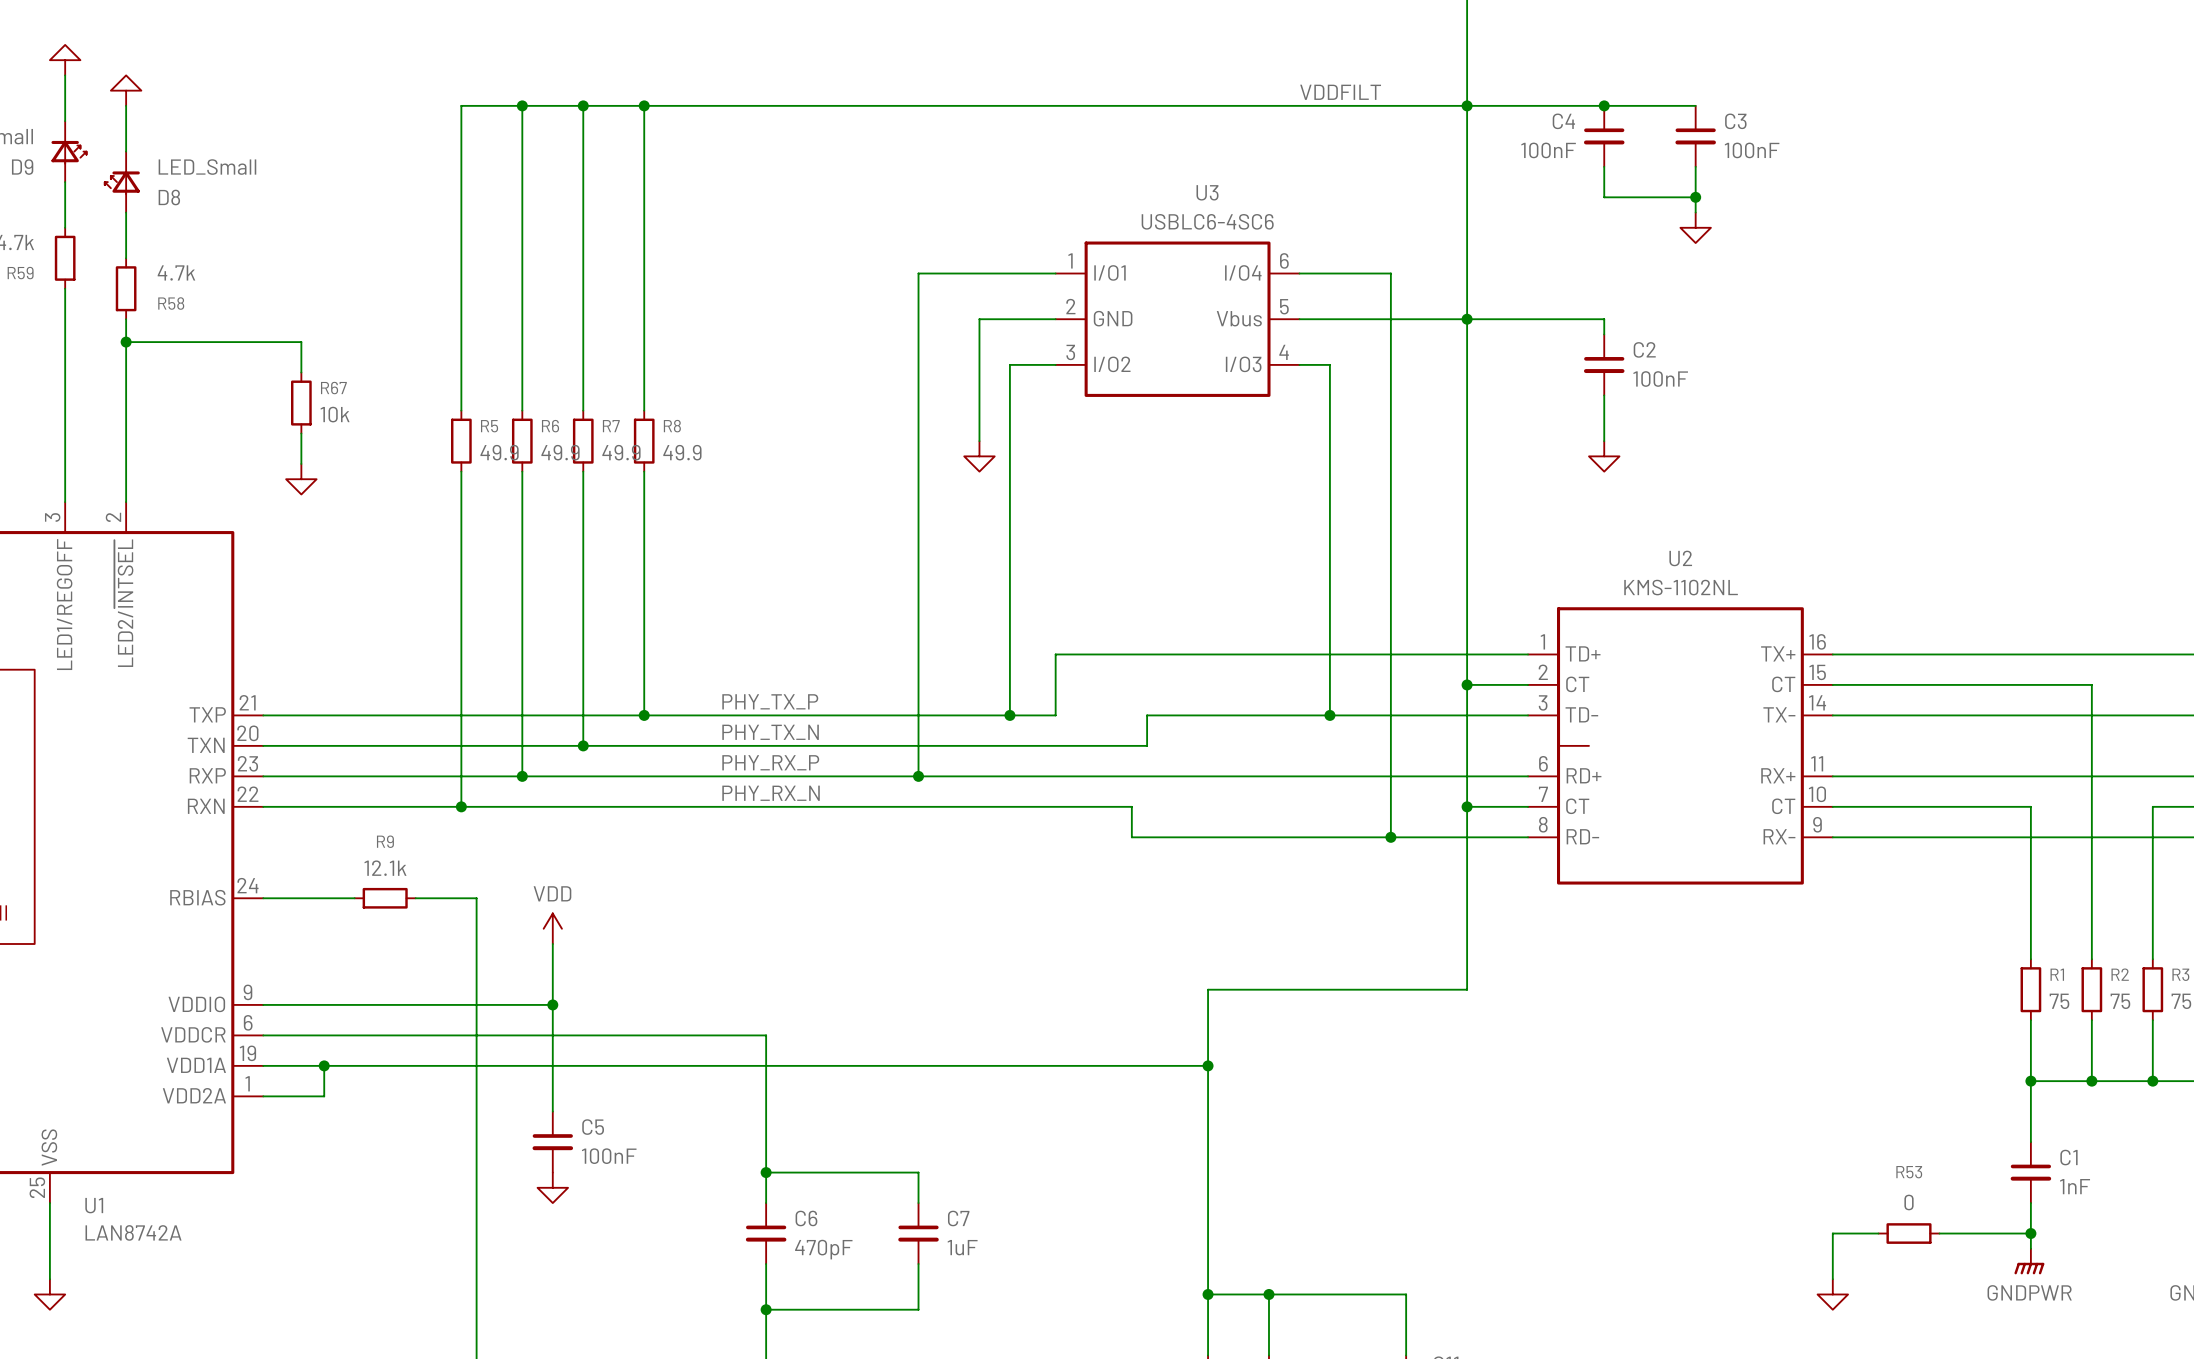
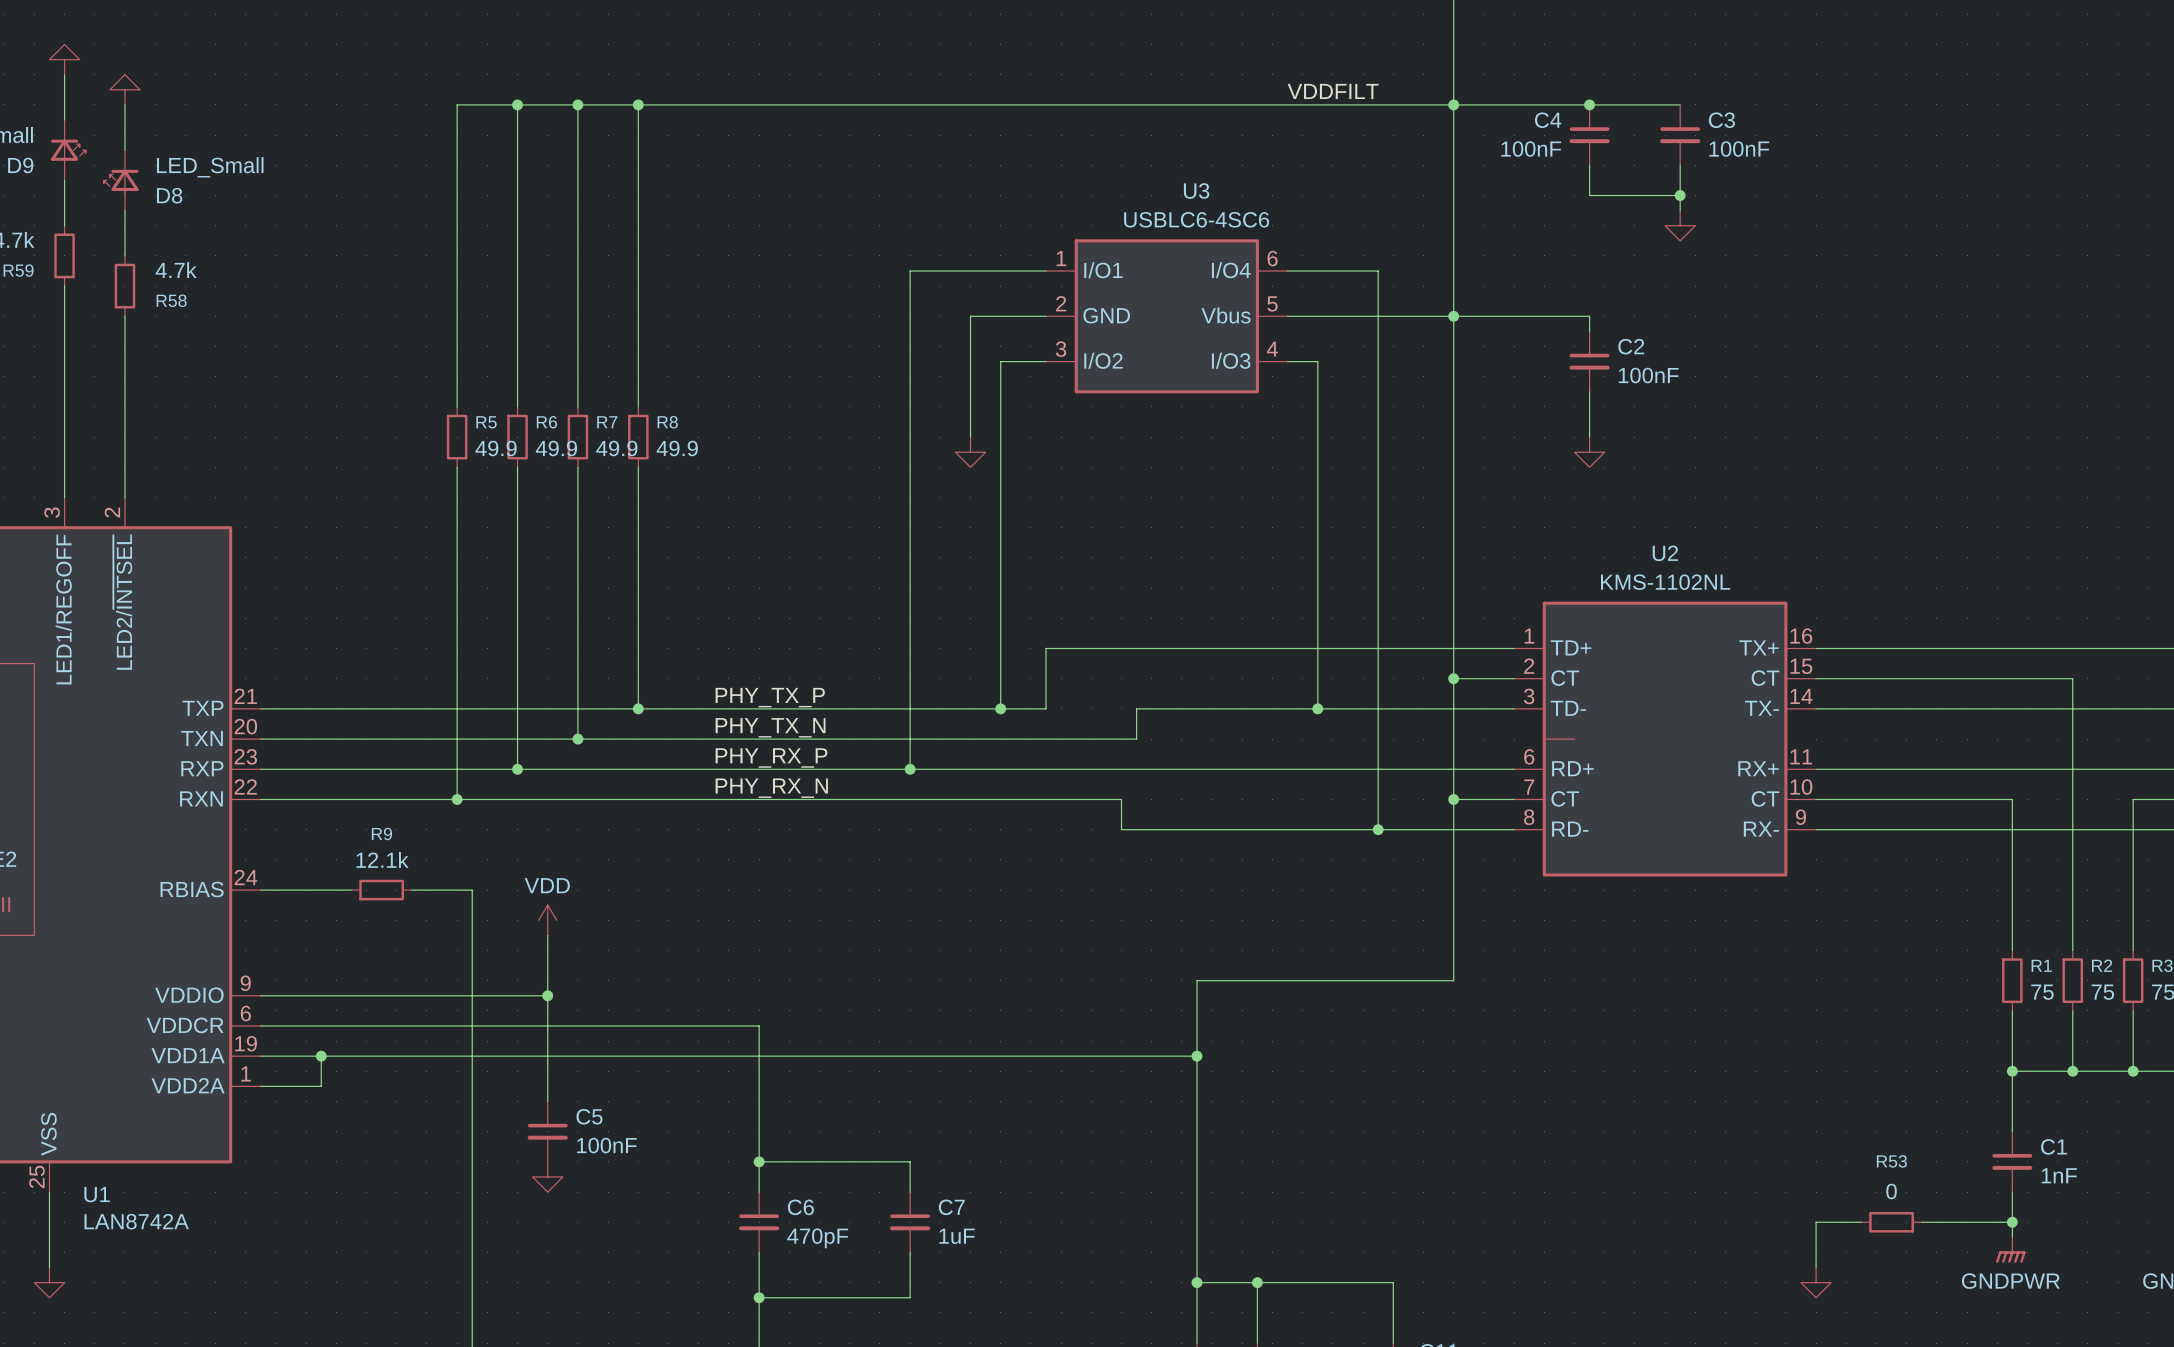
wire: (126, 342) (301, 342) (301, 372) -> none
junction: (126, 342) -> none
R67: 10k (301, 403) -> none
wire: (301, 433) (301, 463) -> none
power symbol: (301, 479) -> none

